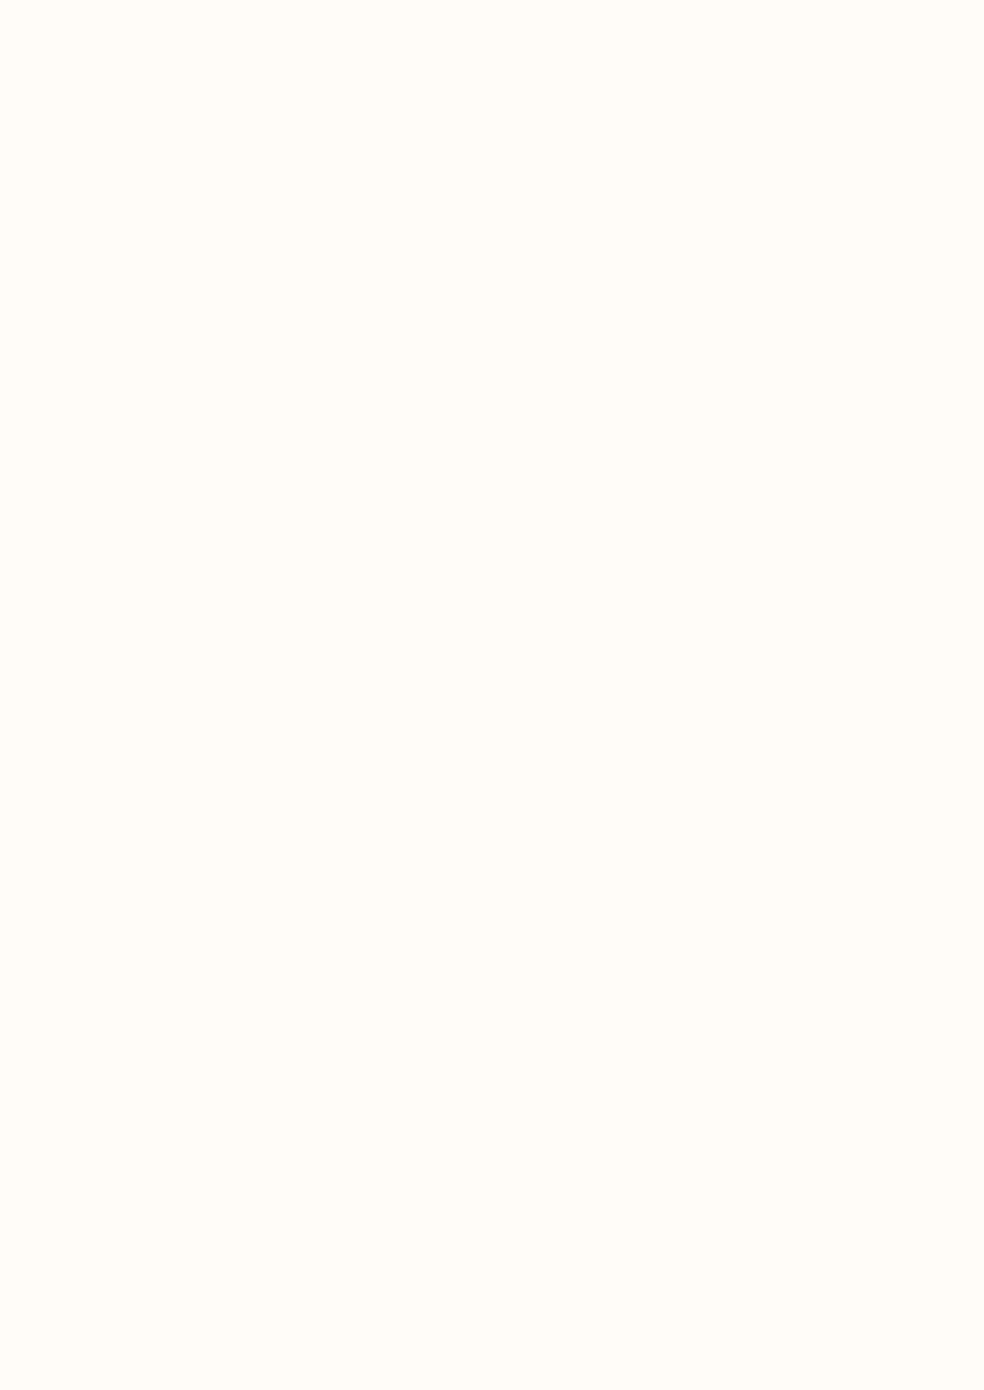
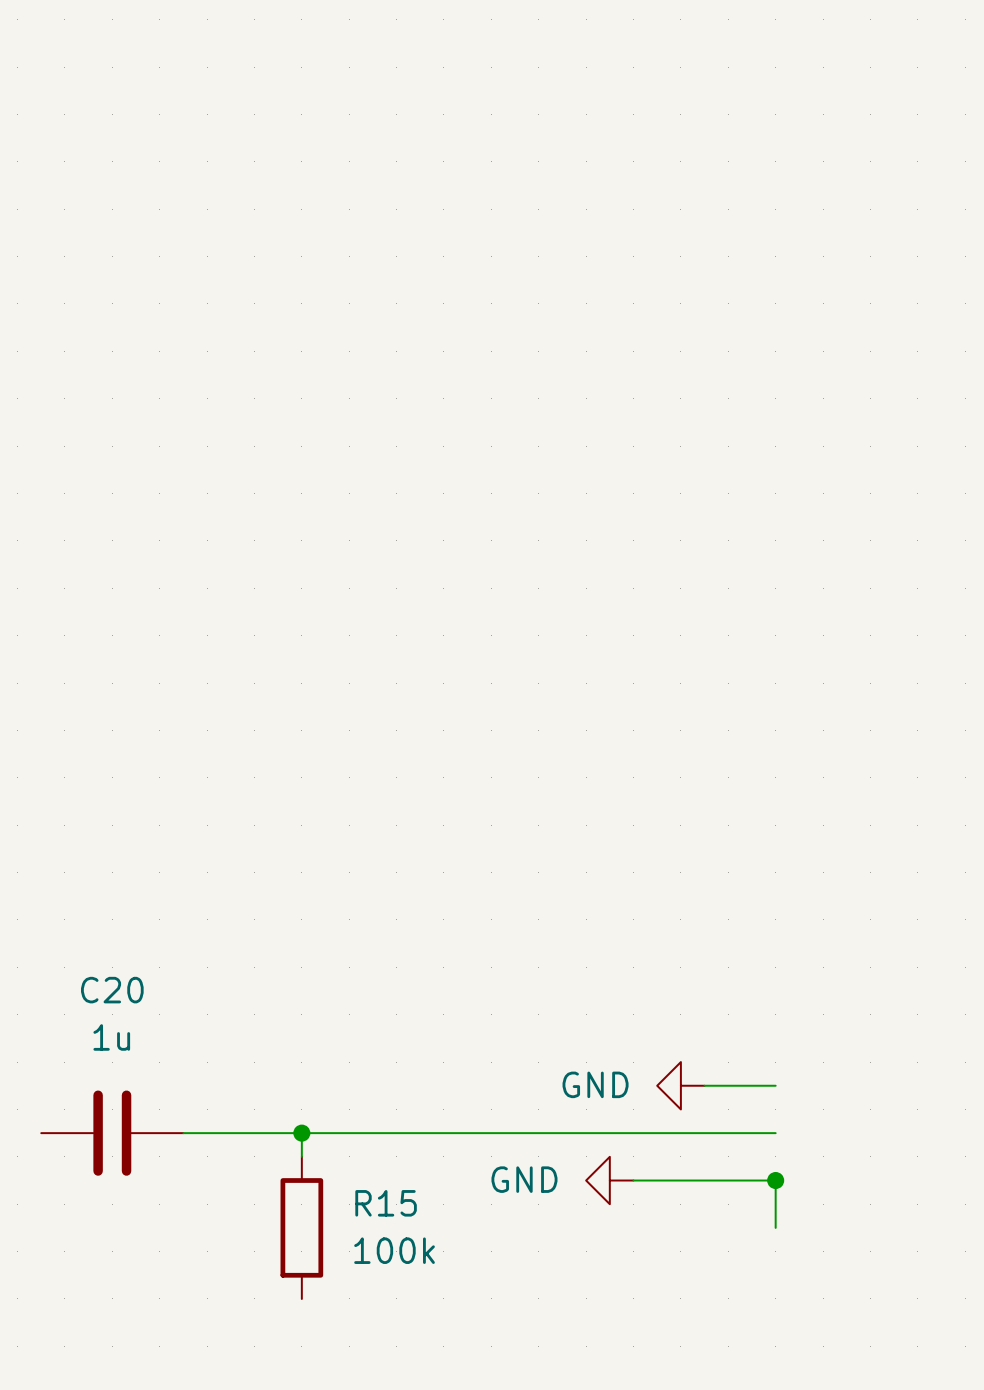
power symbol: none -> GND (680, 1085)
wire: none -> (704, 1085) (775, 1085)
C20: none -> 1u (112, 1133)
wire: none -> (183, 1133) (775, 1133)
wire: none -> (301, 1133) (301, 1156)
junction: none -> (301, 1133)
power symbol: none -> GND (609, 1180)
wire: none -> (633, 1180) (775, 1180) (775, 1227)
junction: none -> (775, 1180)
R15: none -> 100k (301, 1227)

